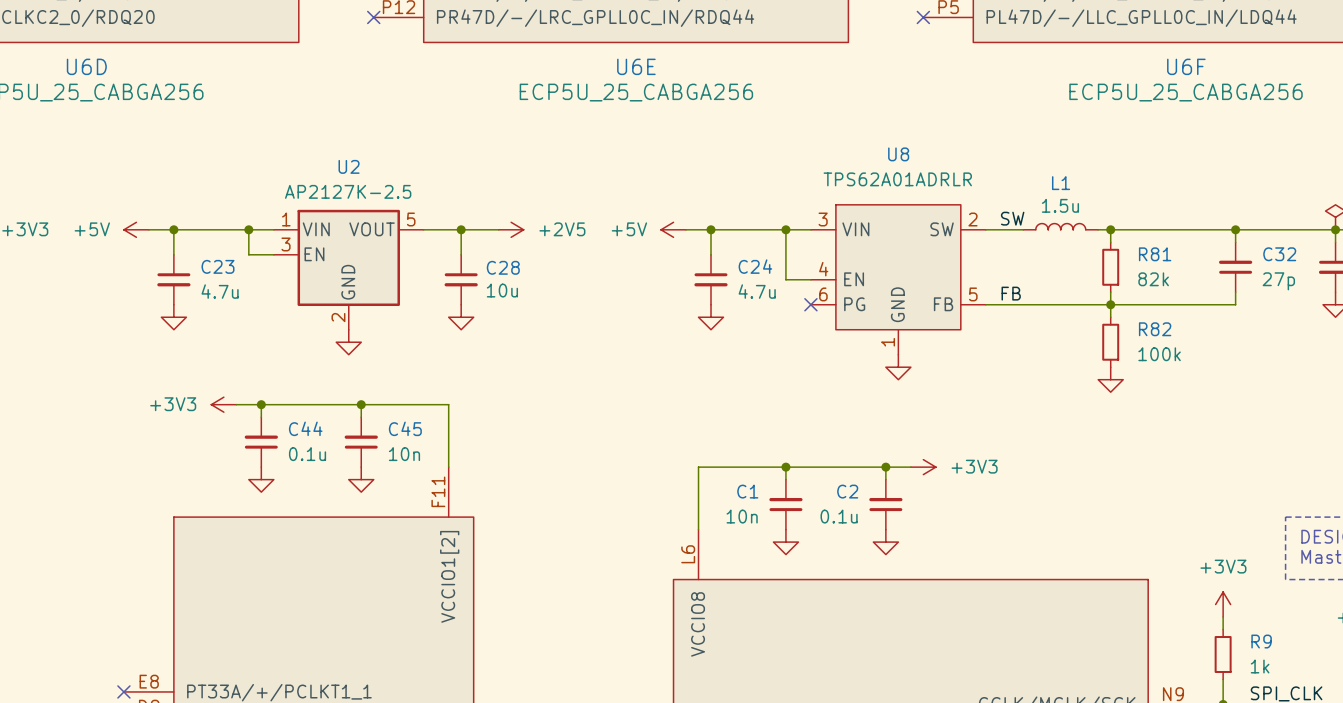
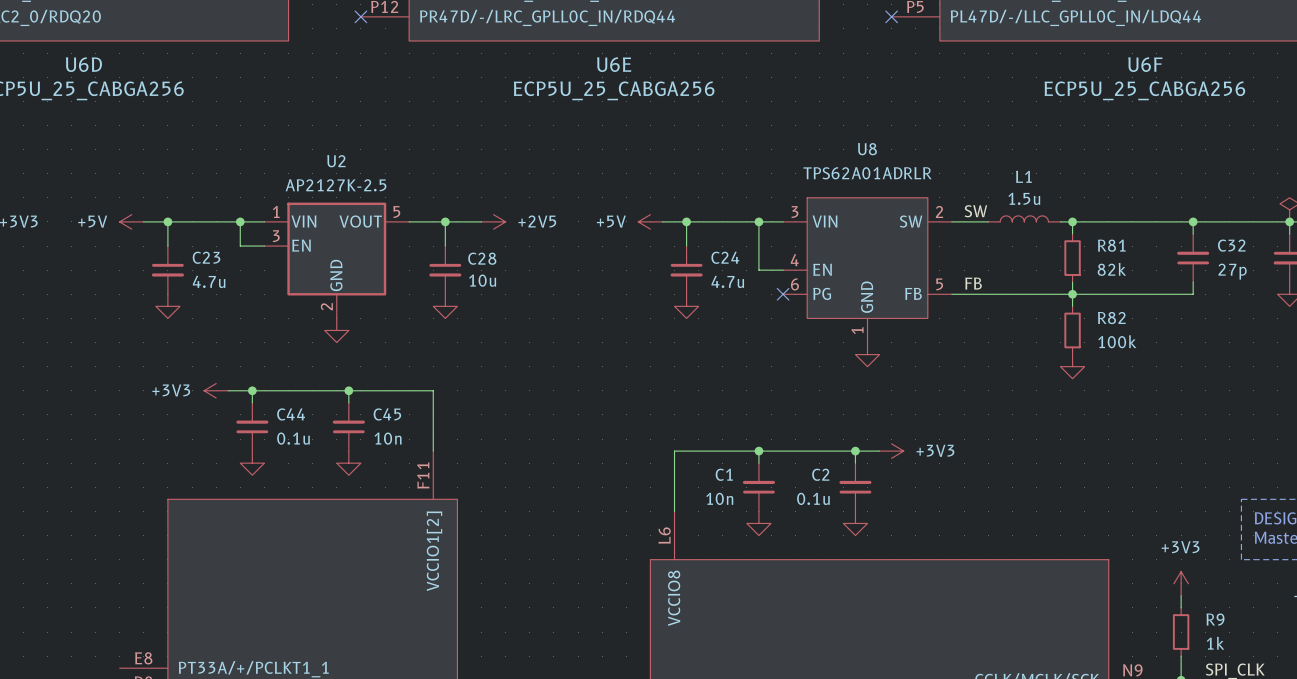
no-connect mark: (123, 691) -> none

